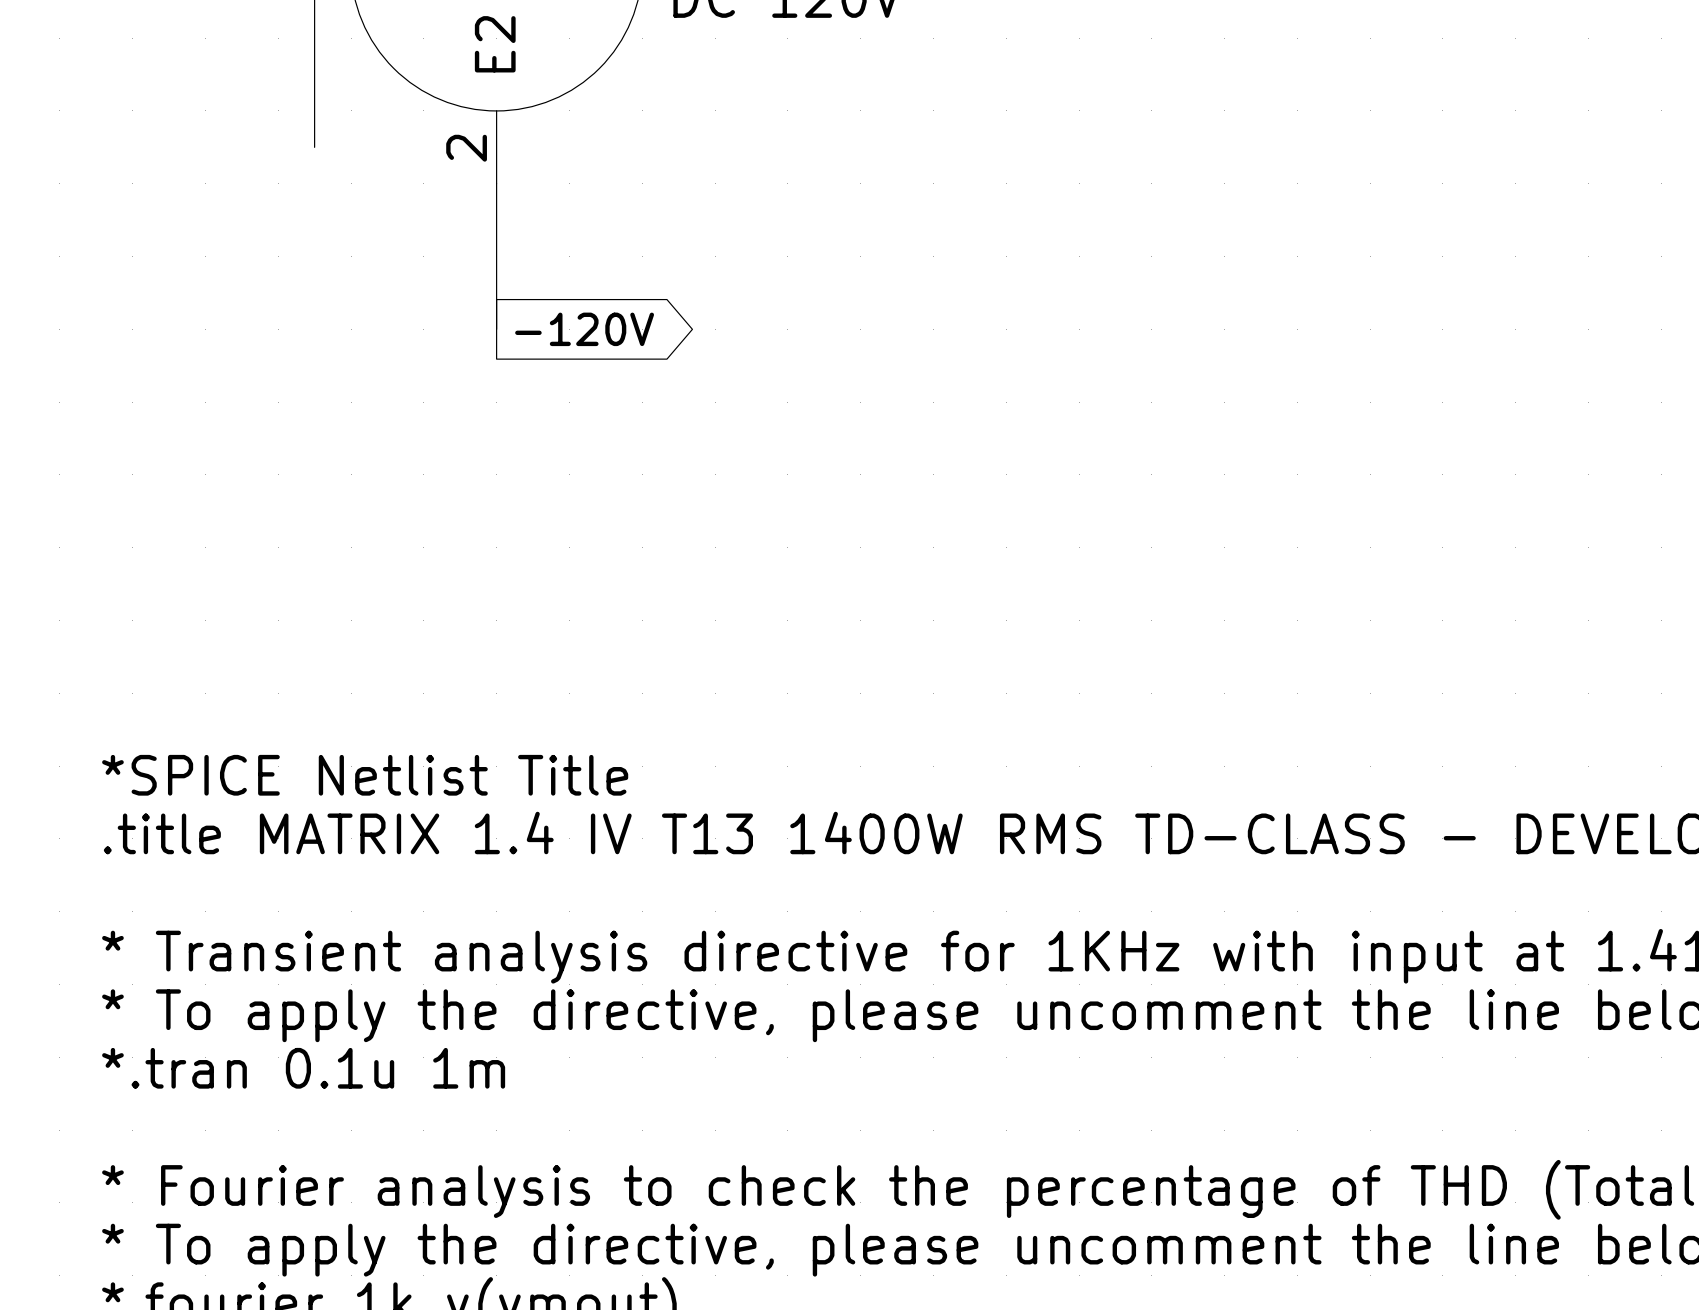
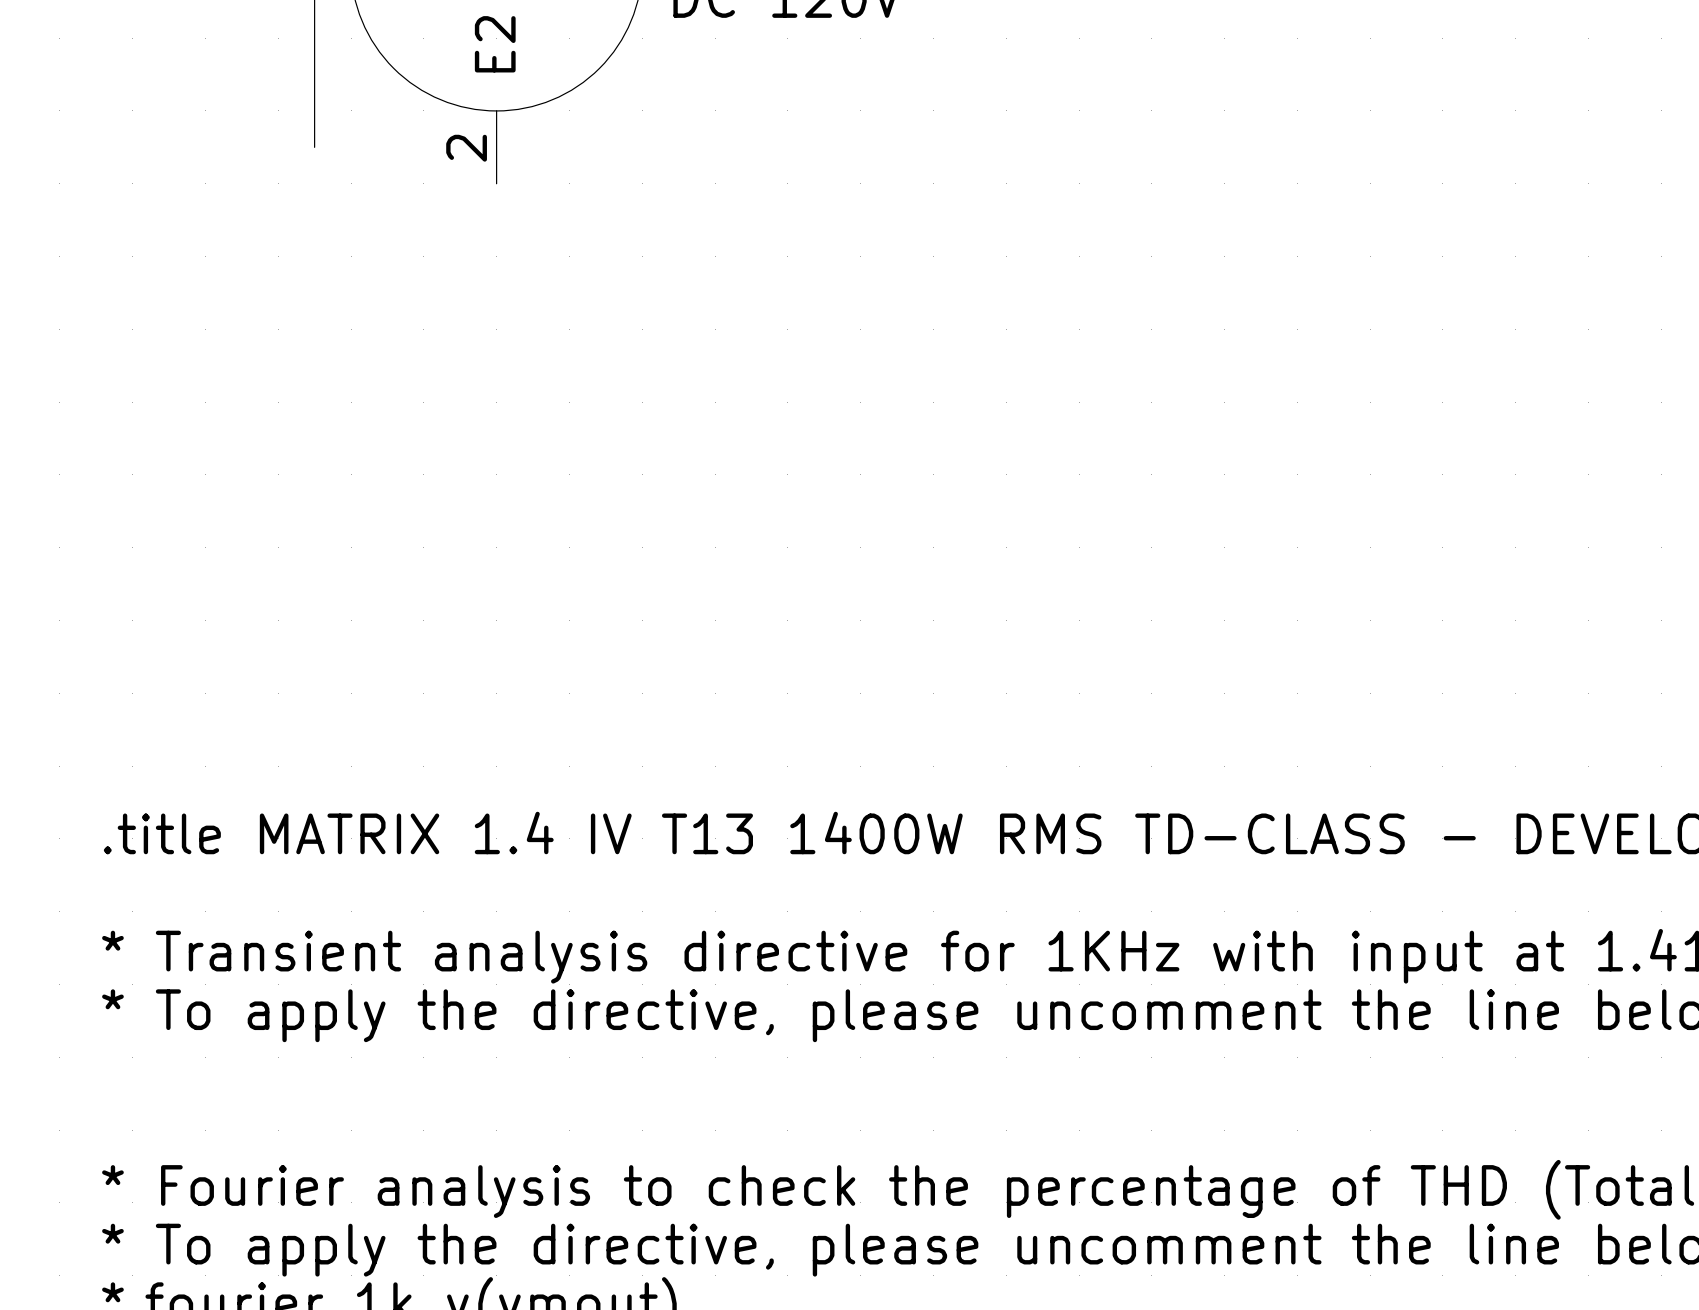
wire: (496, 183) (496, 329) -> none
global label: -120V (584, 329) -> none
text: *SPICE Netlist Title (365, 775) -> none
text: *.tran 0.1u 1m (303, 1068) -> none

